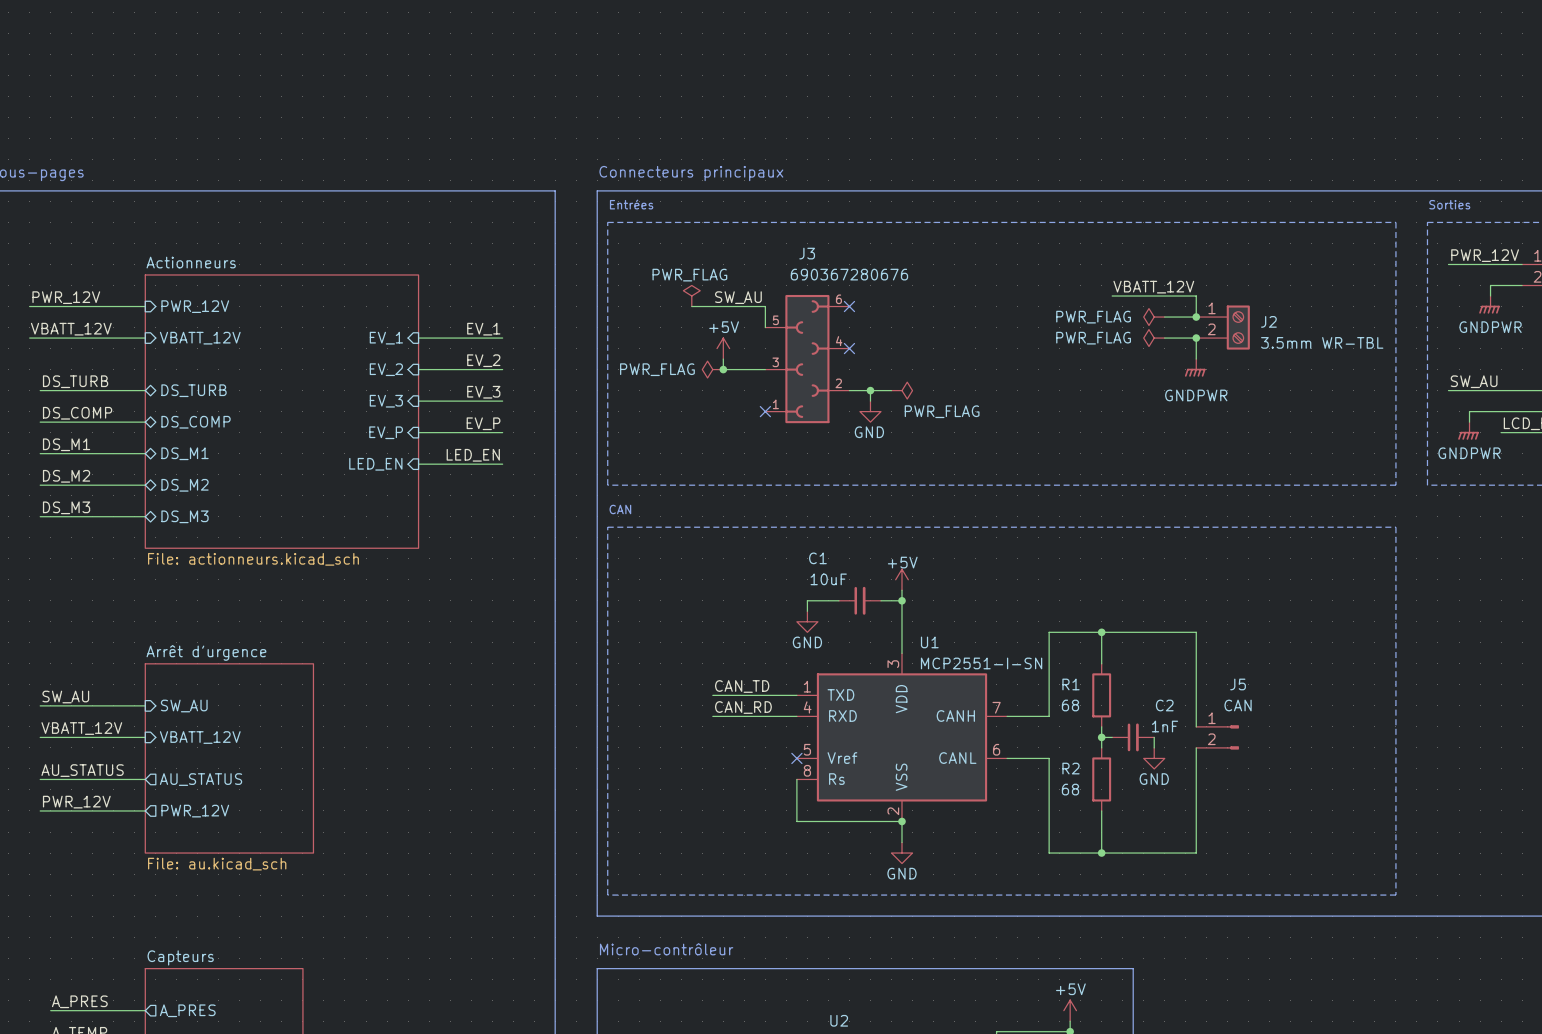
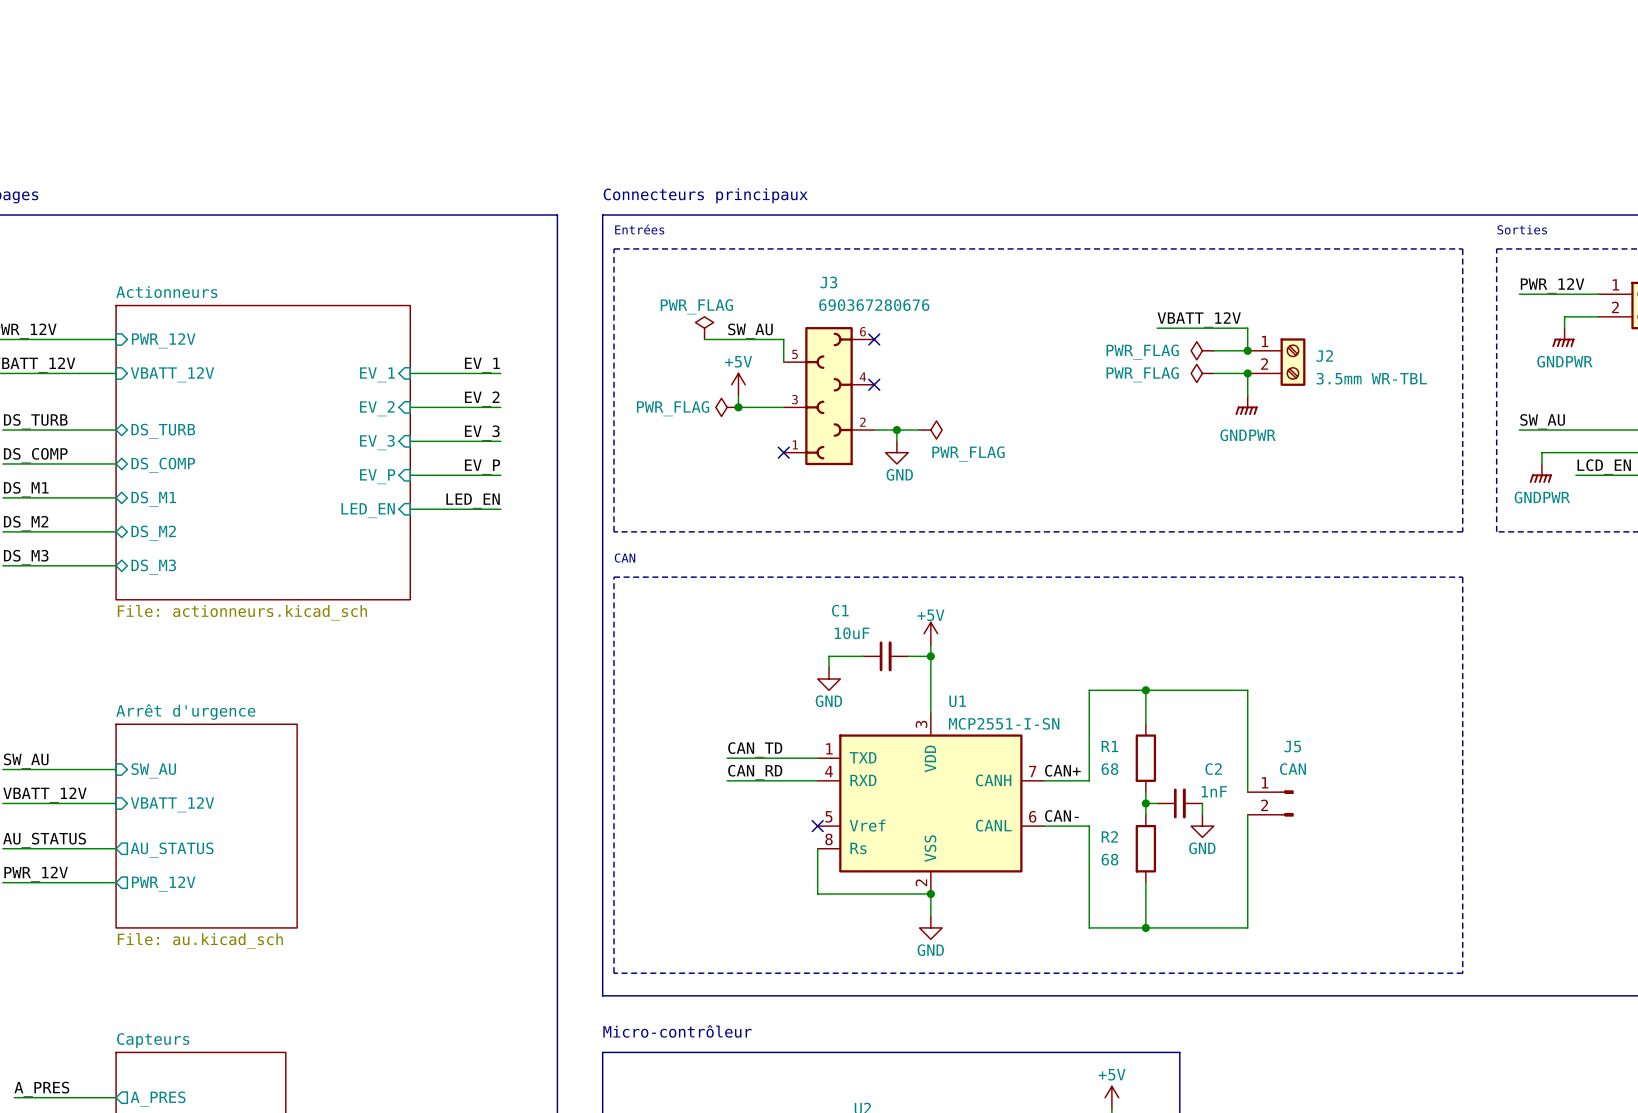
label: none -> CAN+ (1062, 770)
label: none -> CAN- (1061, 816)

